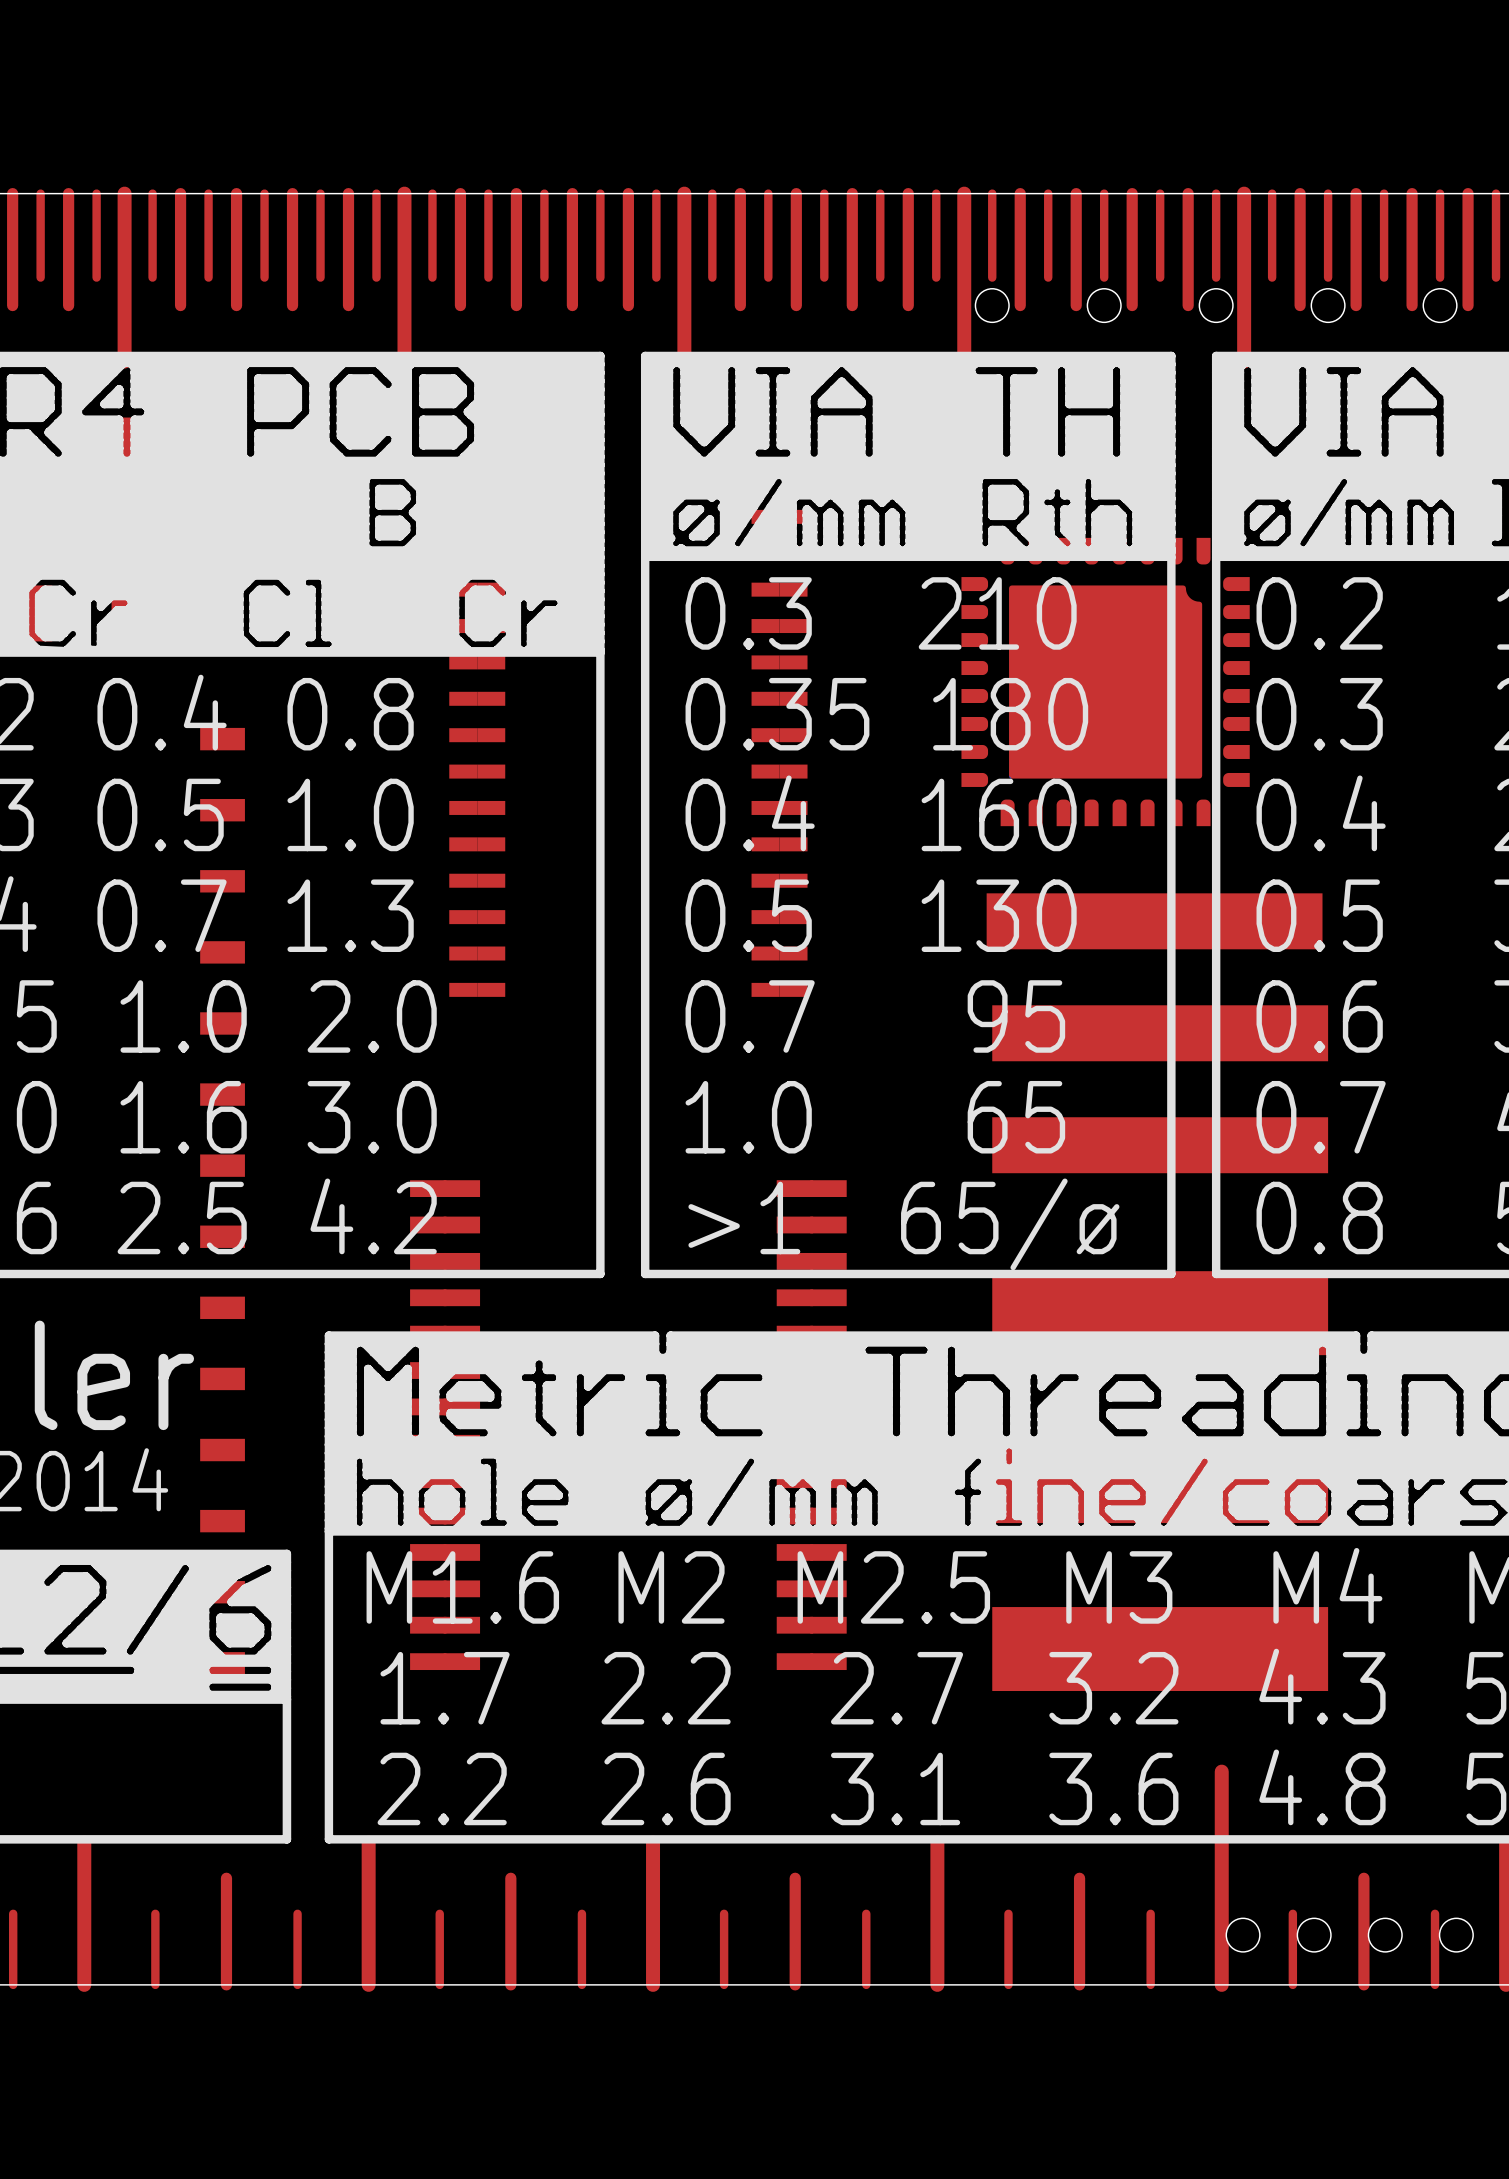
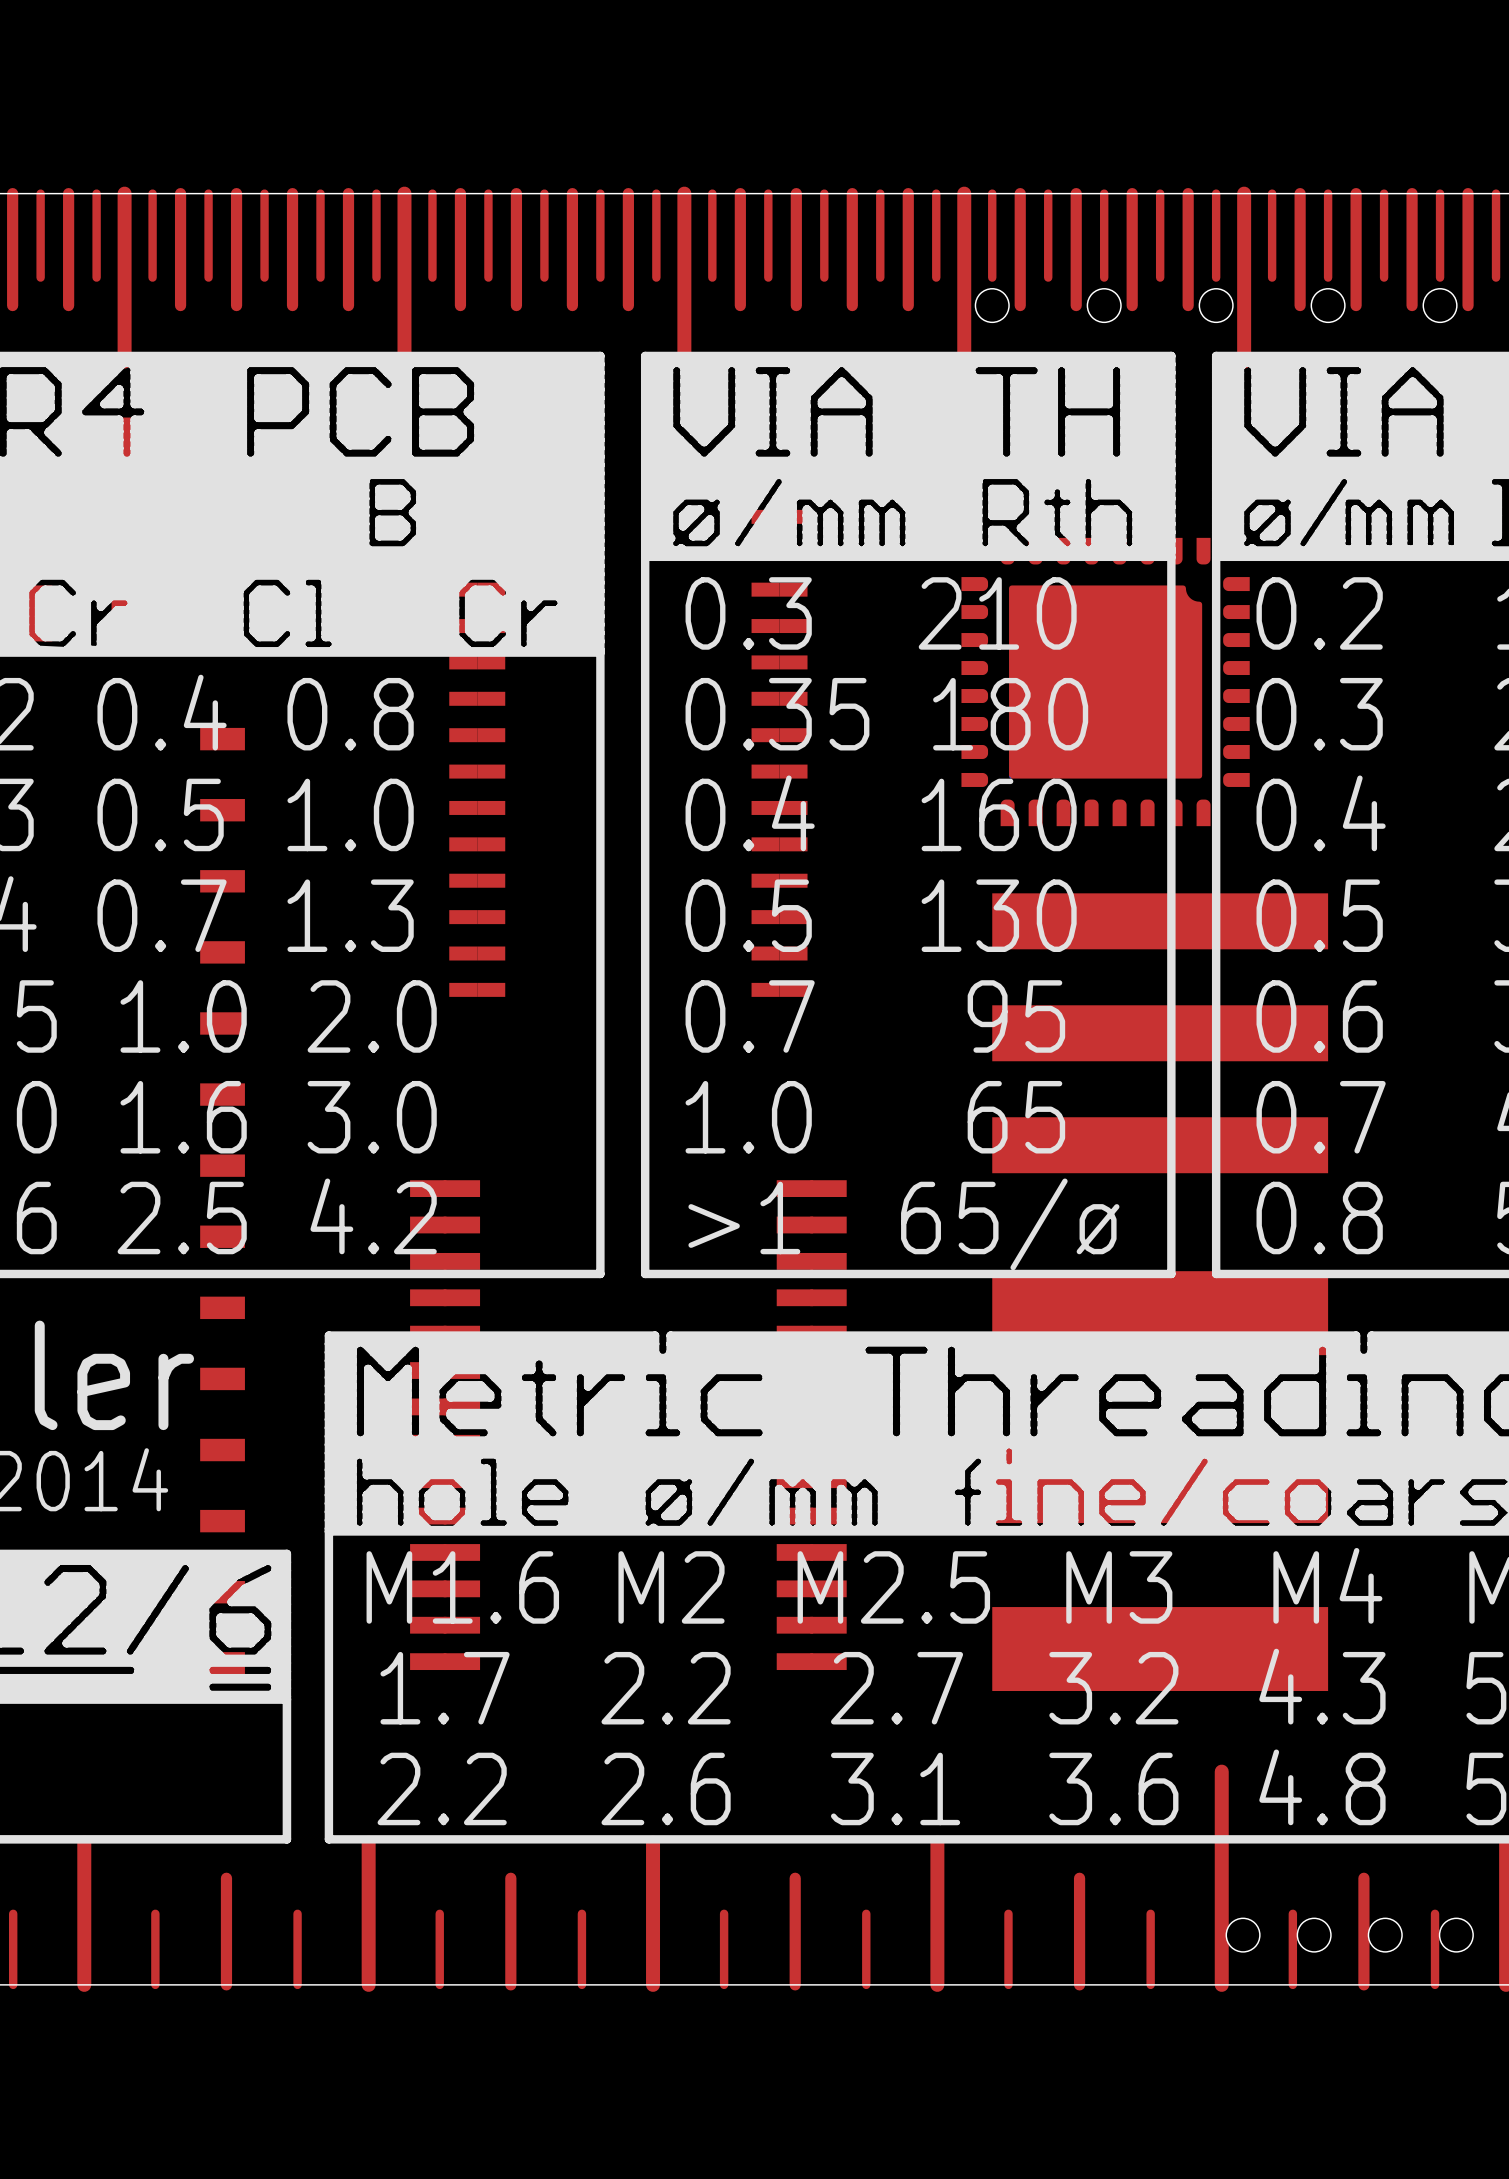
part footprint: [986, 893, 1329, 1174] -> [992, 893, 1329, 1174]

